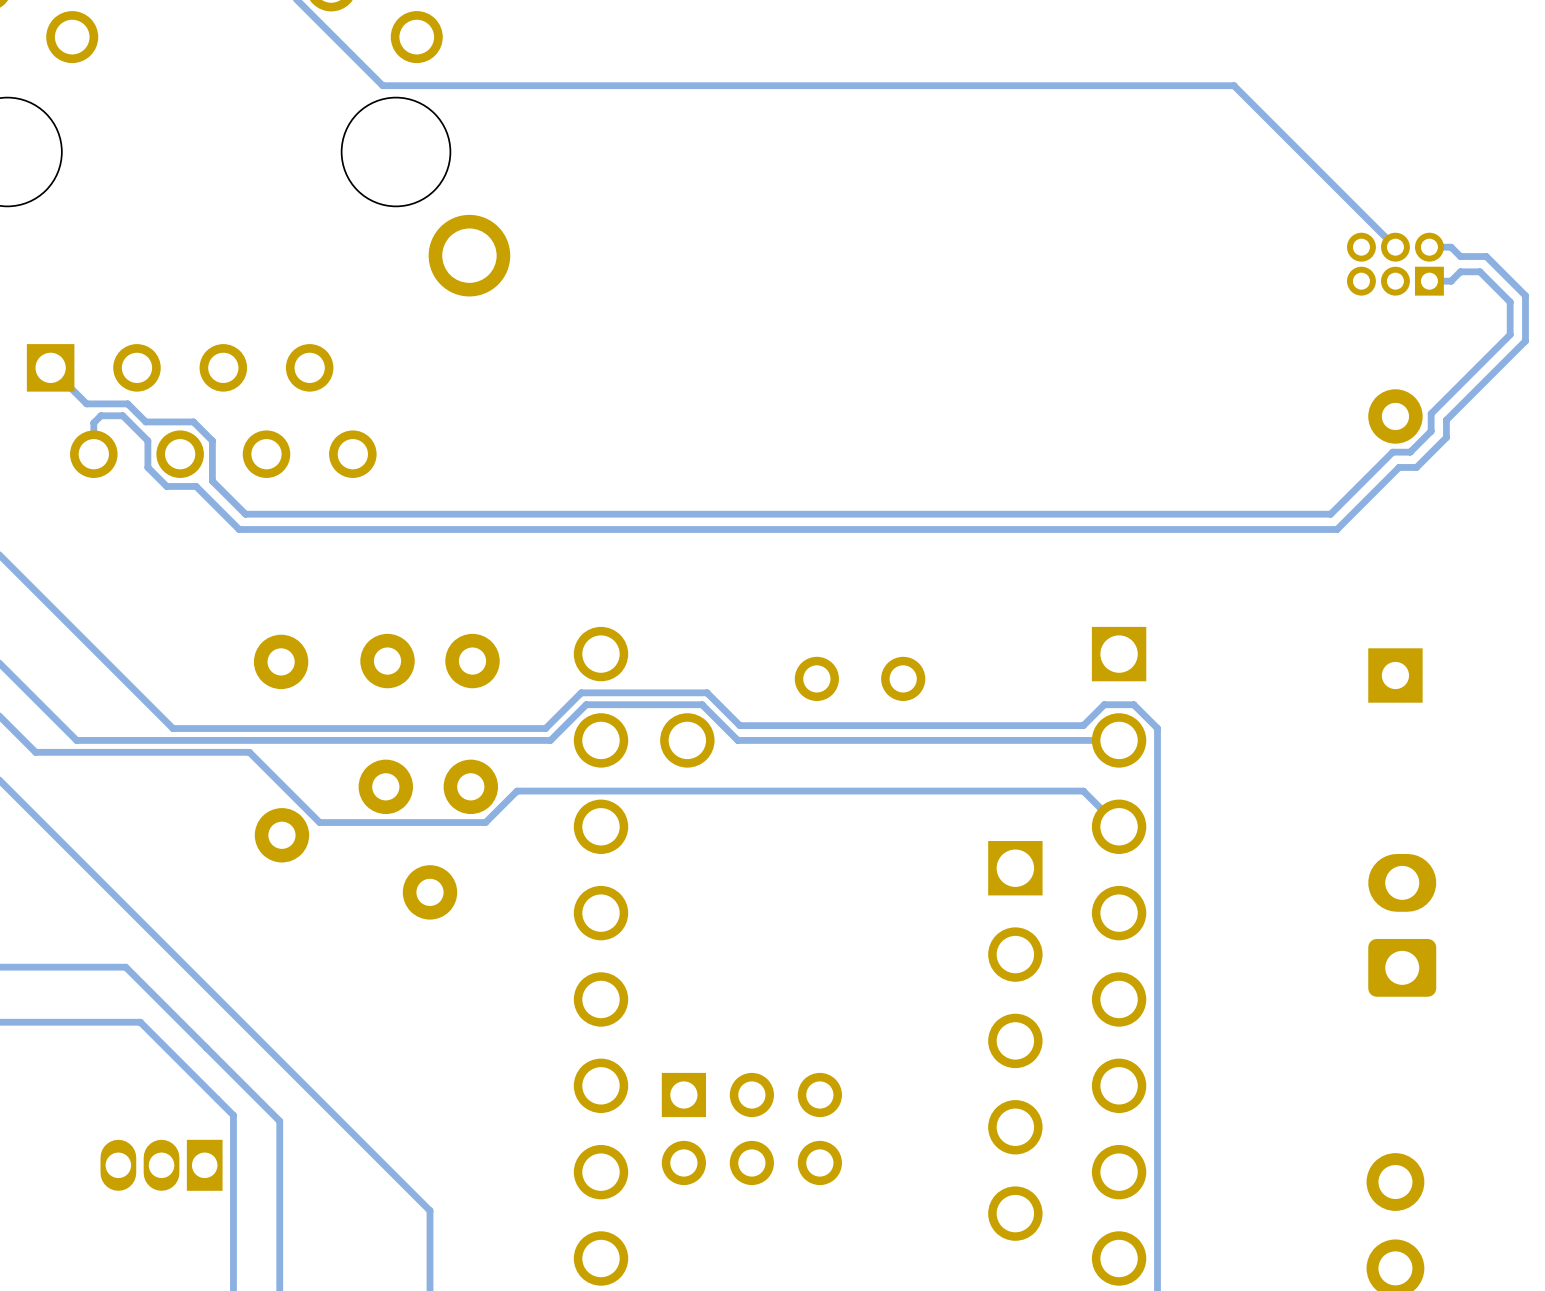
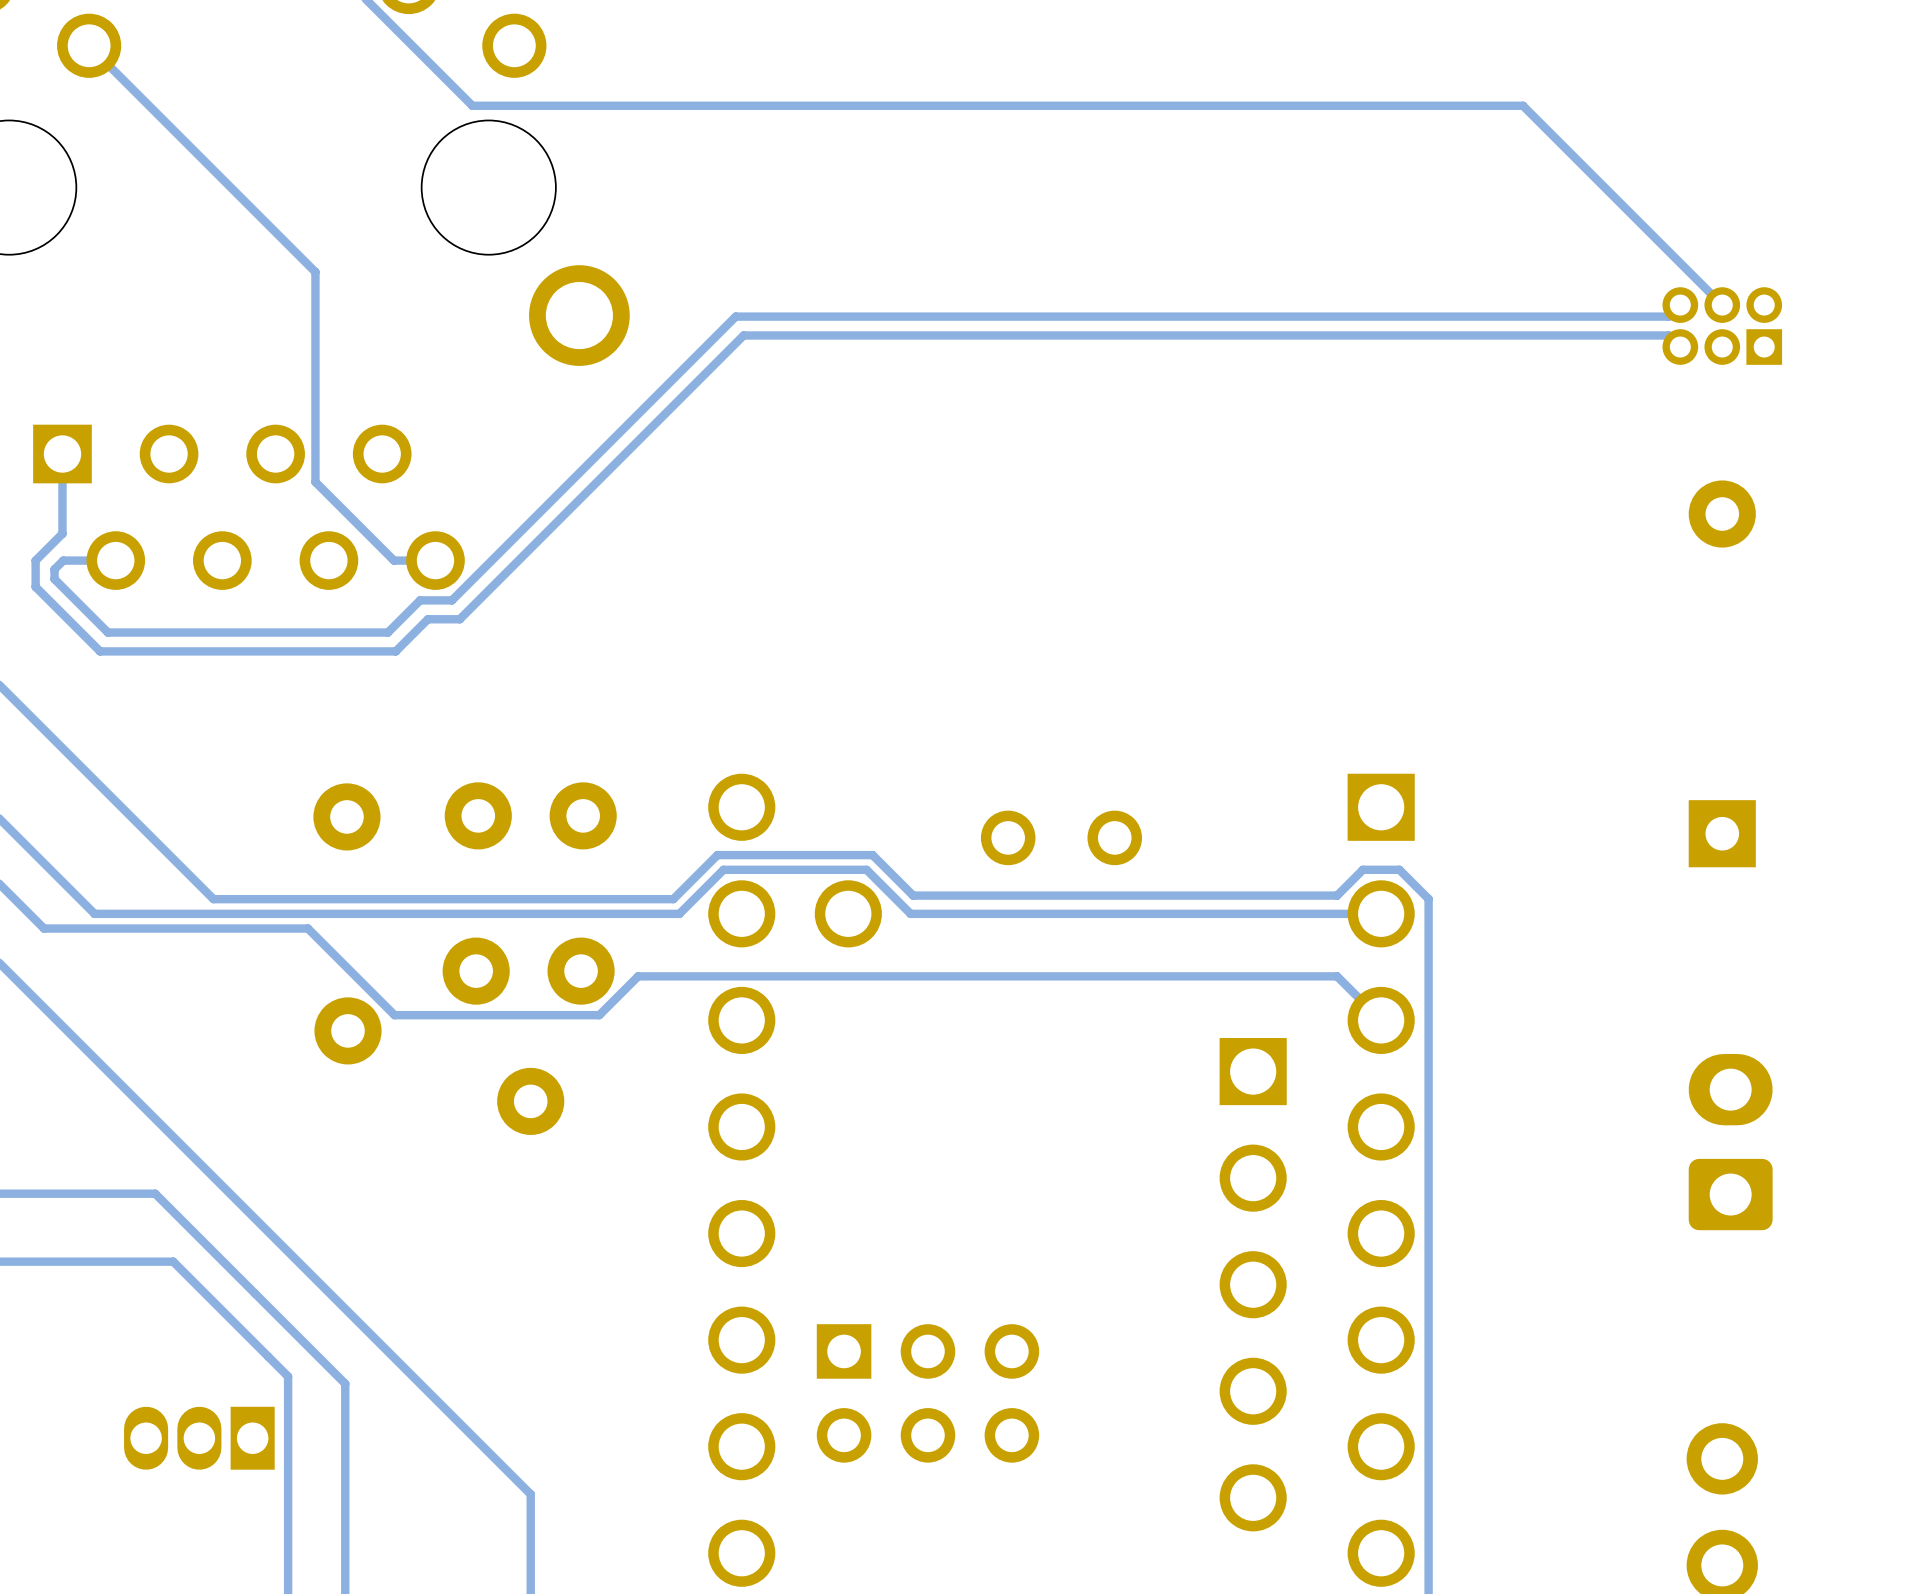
track: none -> (89, 45) (315, 272) (315, 482) (394, 560) (435, 560)
track: (1429, 247) (1451, 247) (1460, 256) (1486, 256) (1525, 295) (1525, 341) (1446, 420) (1446, 437) (1416, 467) (1399, 467) (1337, 529) (239, 529) (196, 486) (166, 486) (147, 467) (147, 440) (122, 415) (100, 415) (93, 422) (93, 454) -> (1680, 305) (1668, 316) (735, 316) (451, 600) (420, 600) (387, 632) (107, 632) (54, 579) (54, 569) (63, 560) (115, 560)
track: (1429, 281) (1451, 281) (1460, 271) (1479, 271) (1510, 302) (1510, 334) (1431, 413) (1431, 431) (1410, 452) (1392, 452) (1330, 514) (245, 514) (212, 481) (212, 440) (193, 421) (145, 421) (127, 403) (86, 403) (50, 367) -> (1680, 347) (1668, 335) (743, 335) (459, 619) (427, 619) (395, 651) (100, 651) (35, 586) (35, 560) (62, 533) (62, 454)

